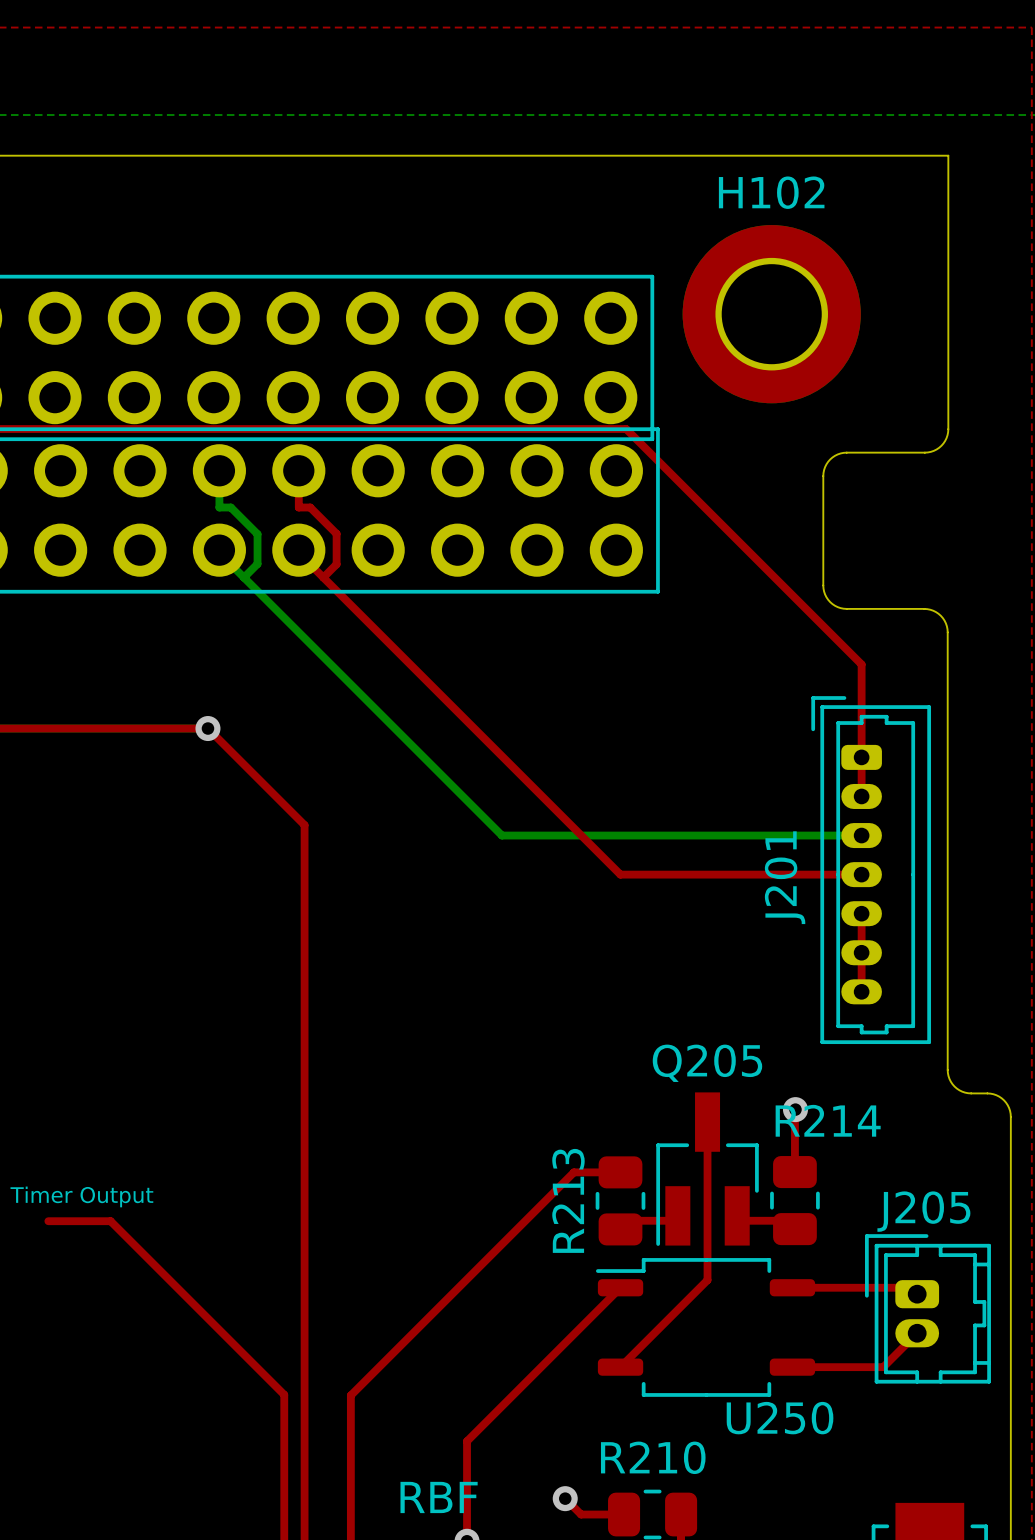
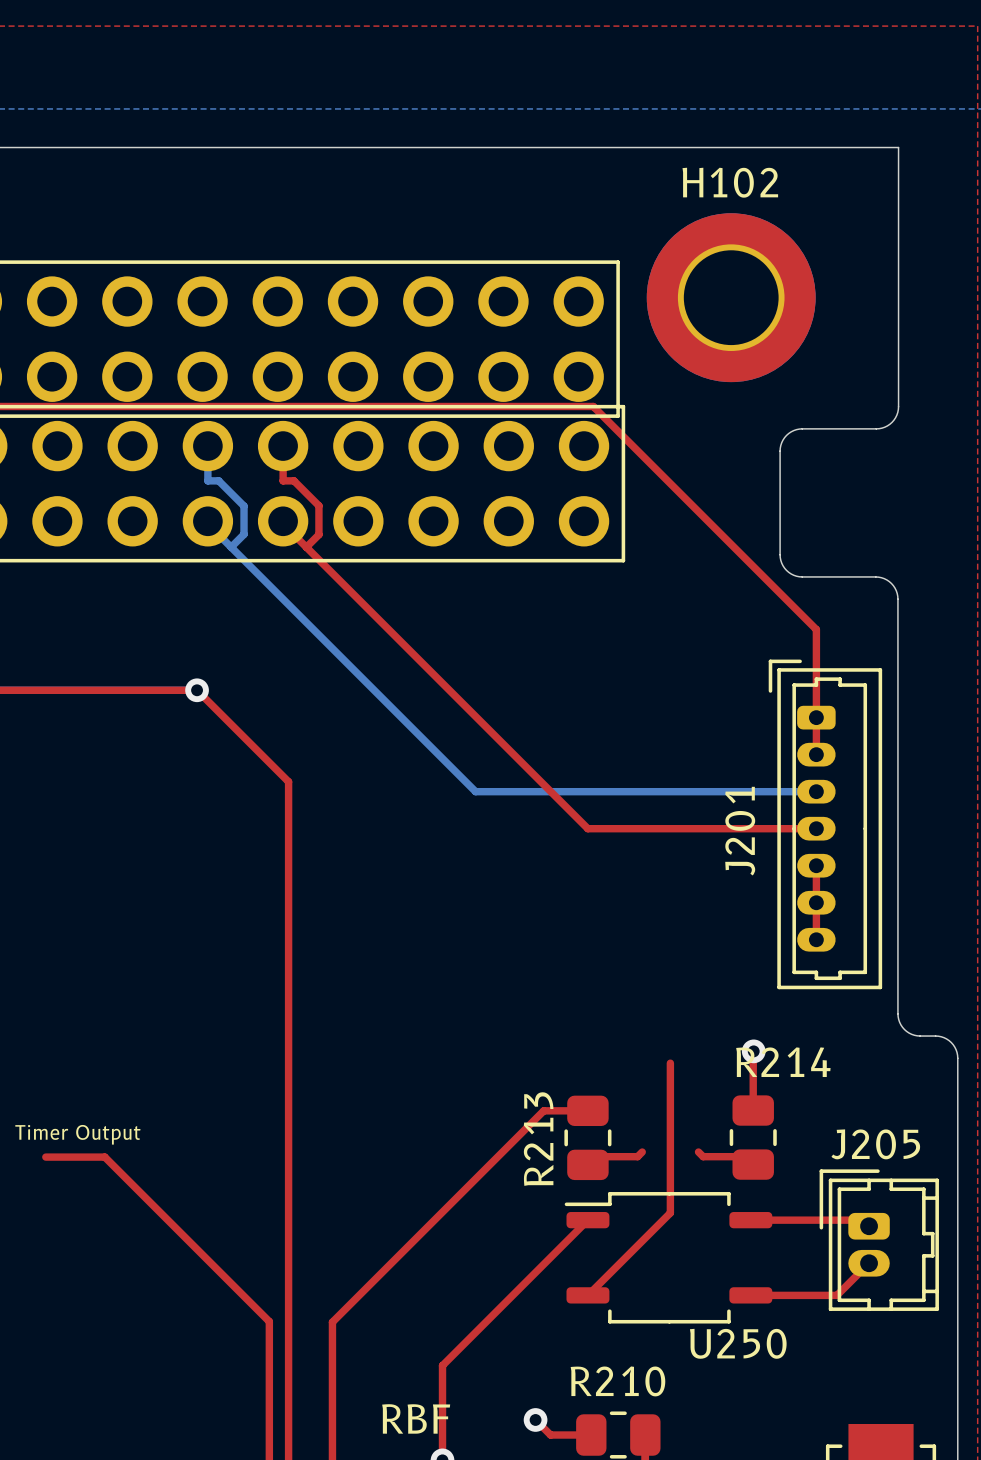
Q205: (707, 1169) -> none

